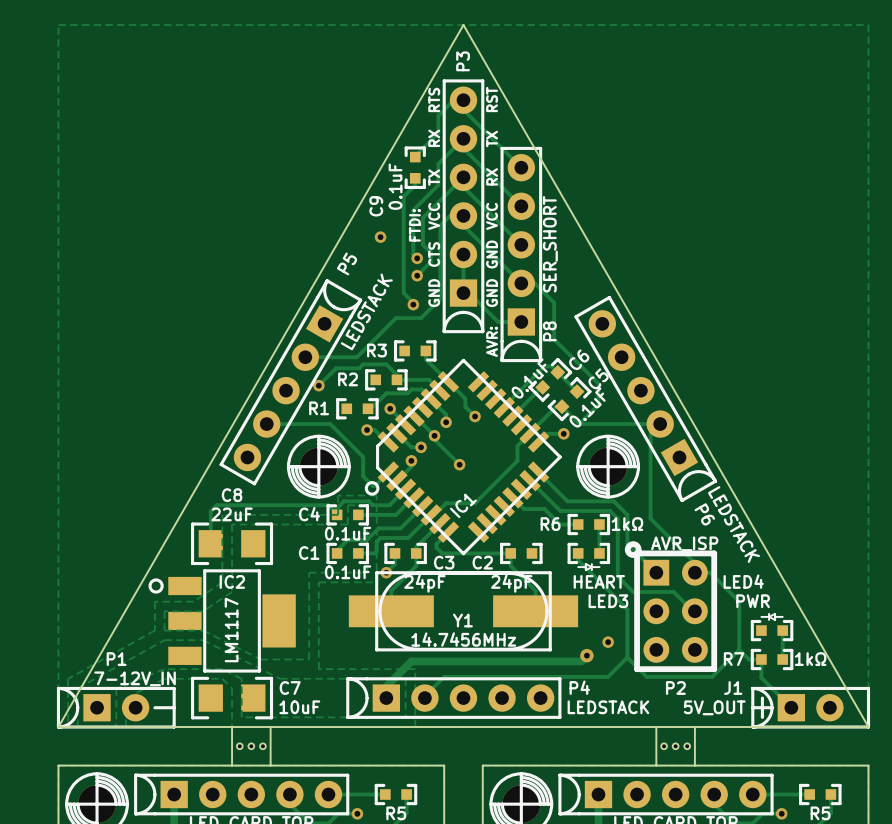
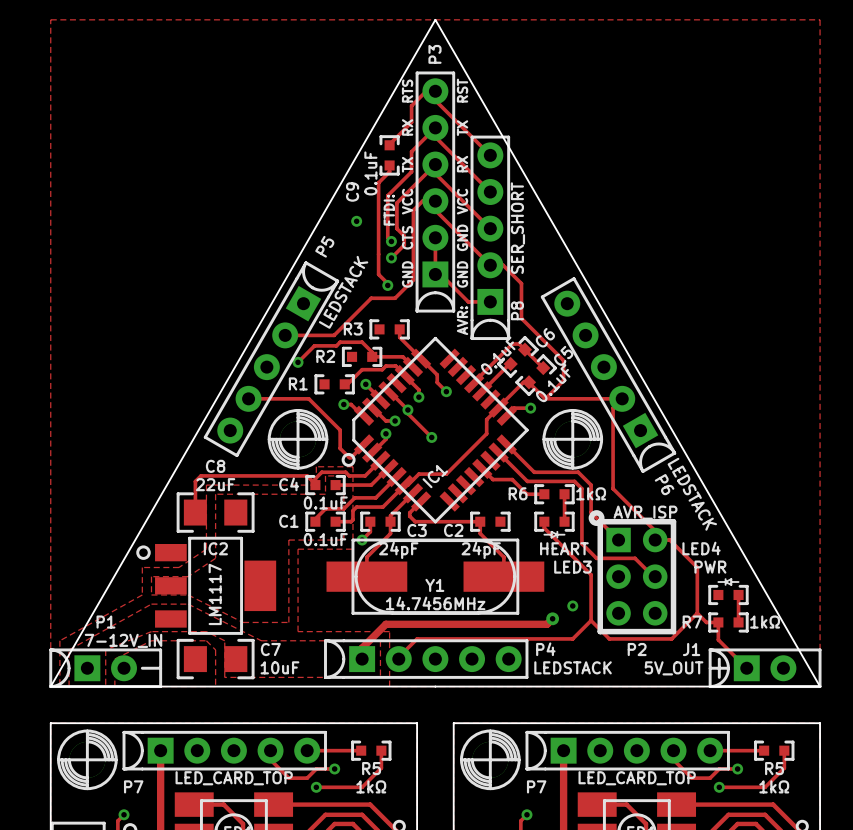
board edge: (232, 727) (232, 765) -> none
board edge: (270, 727) (270, 765) -> none
board edge: (656, 727) (656, 765) -> none
board edge: (694, 727) (694, 765) -> none
part: (239, 746) -> none
part: (251, 746) -> none
part: (262, 746) -> none
part: (664, 746) -> none
part: (675, 746) -> none
part: (687, 746) -> none

